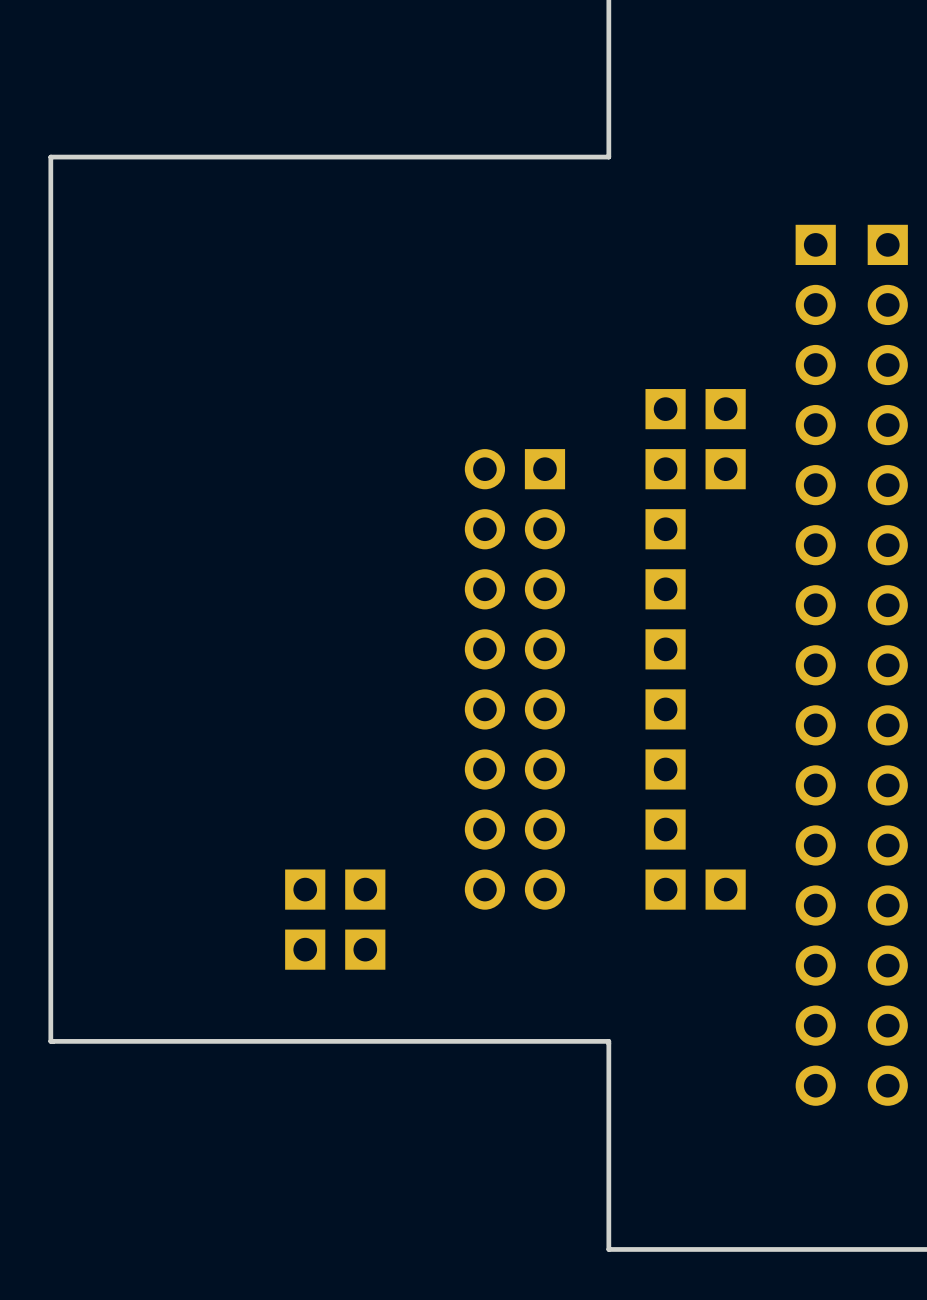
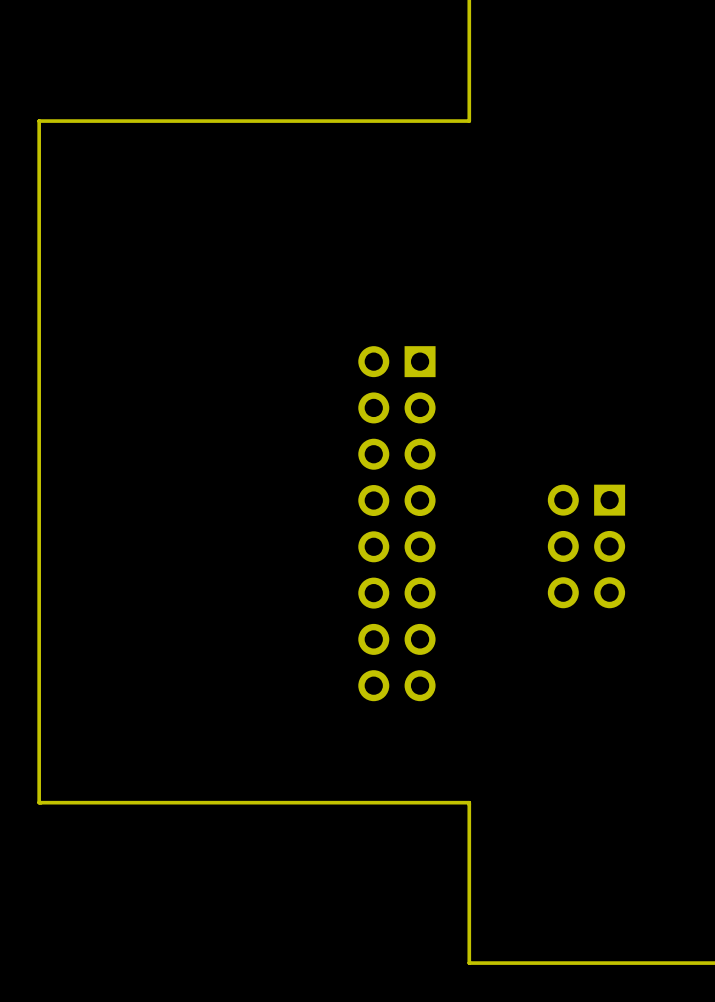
part: (665, 409) -> none
part: (725, 409) -> none
part: (665, 469) -> none
part: (725, 469) -> none
part: (665, 529) -> none
part: (665, 589) -> none
part: (665, 649) -> none
part: (815, 665) -> none
part: (887, 665) -> none
part: none -> (586, 546)
part: (665, 709) -> none
part: (665, 769) -> none
part: (665, 829) -> none
part: (305, 889) -> none
part: (365, 889) -> none
part: (665, 889) -> none
part: (725, 889) -> none
part: (305, 949) -> none
part: (365, 949) -> none

